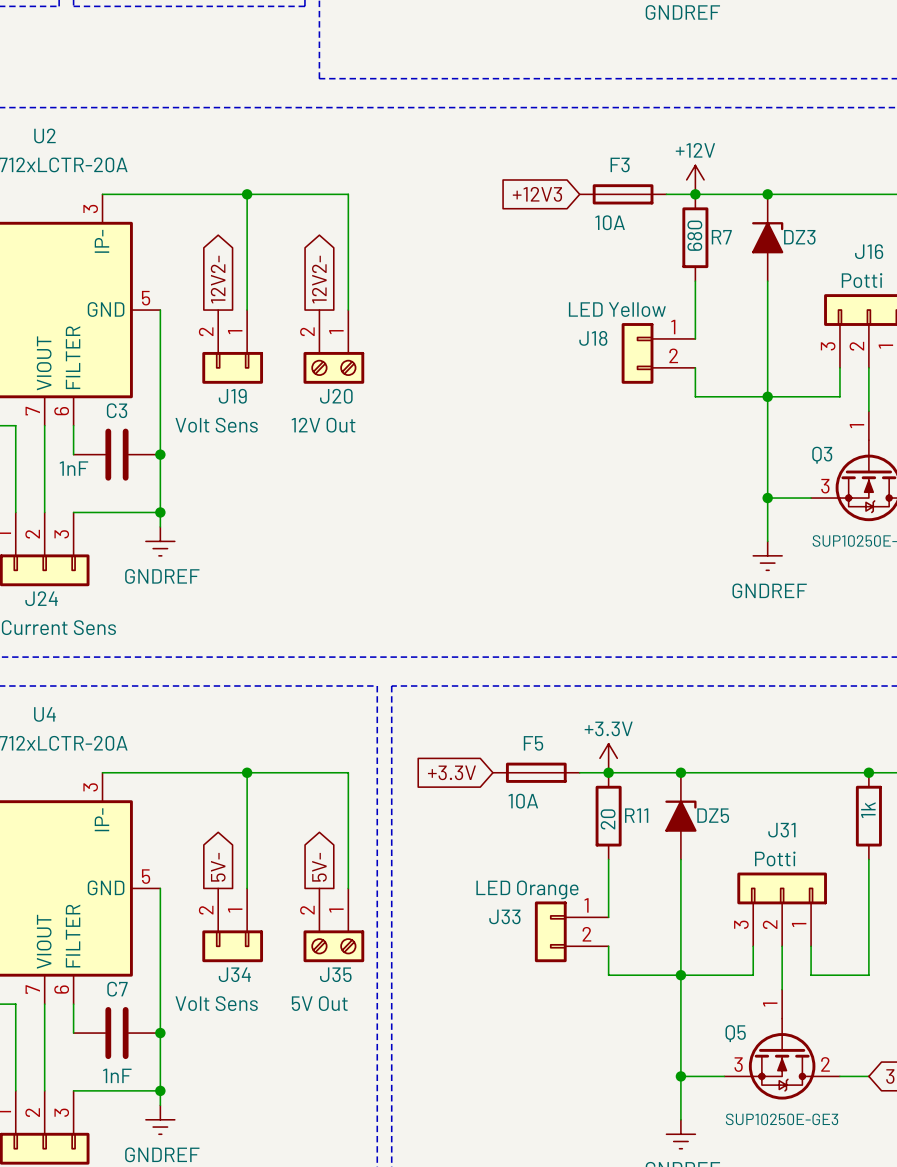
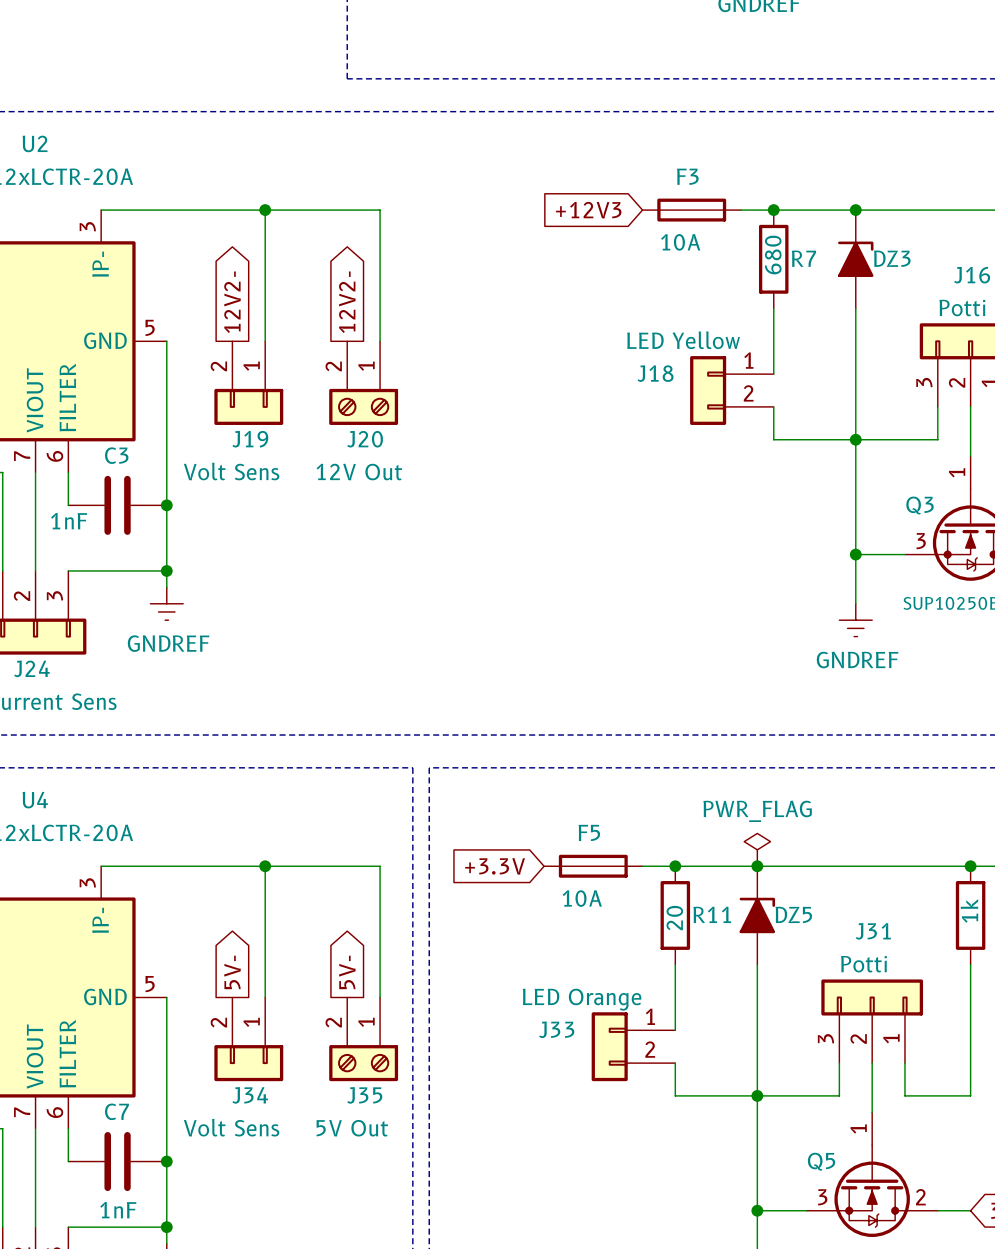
power symbol: +12V (695, 179) -> none
power symbol: +3.3V (608, 758) -> none
power symbol: none -> PWR_FLAG (757, 849)

